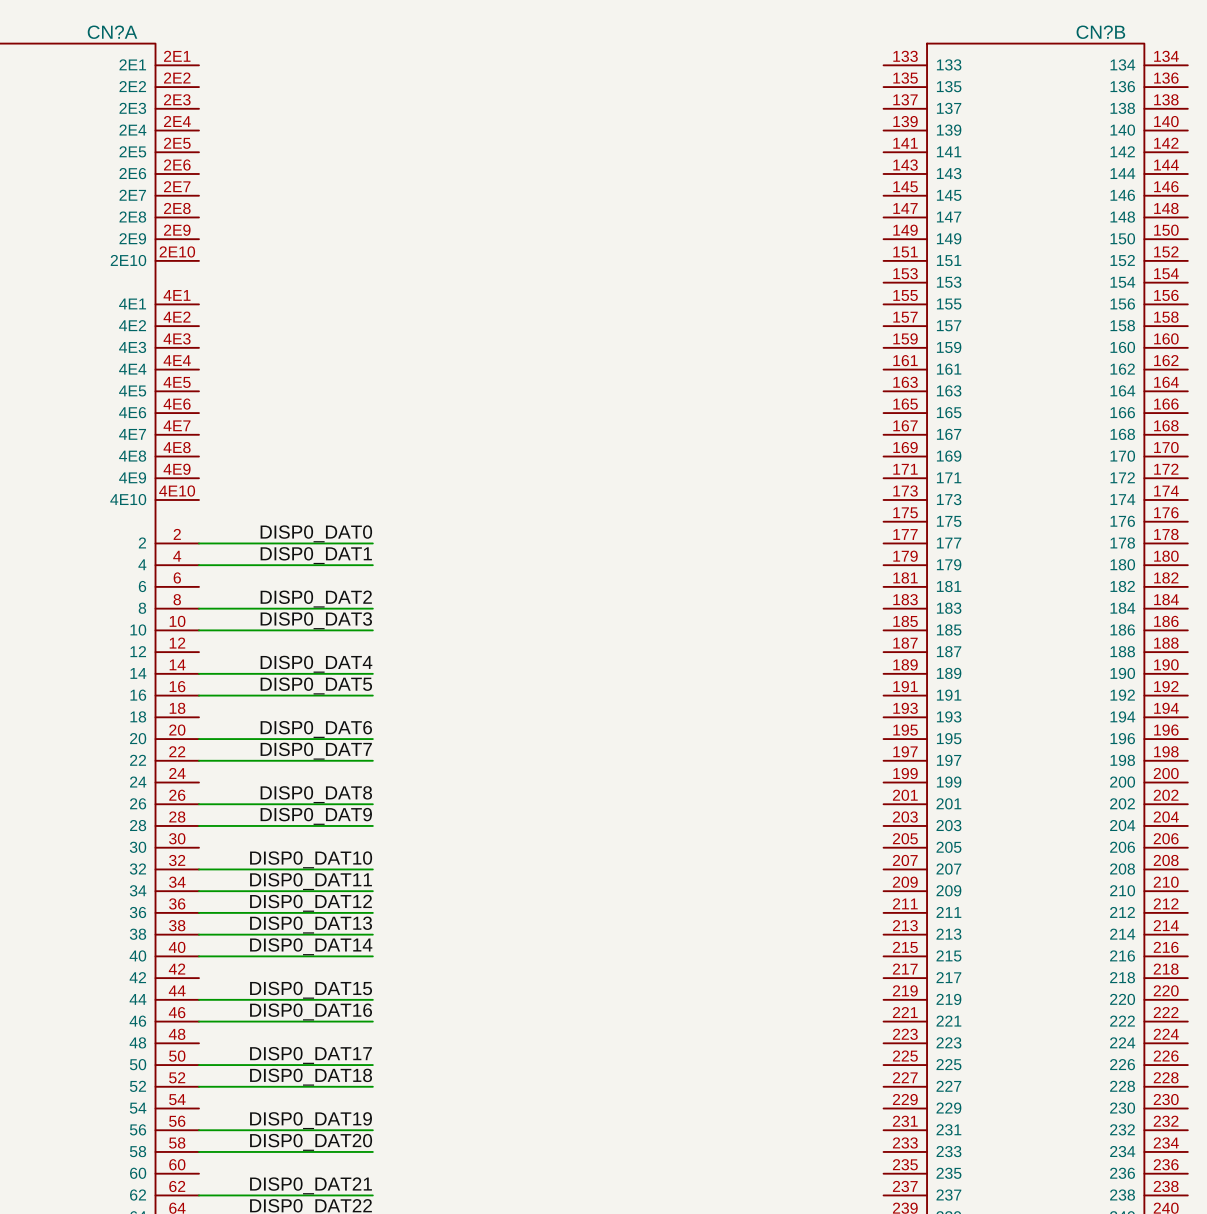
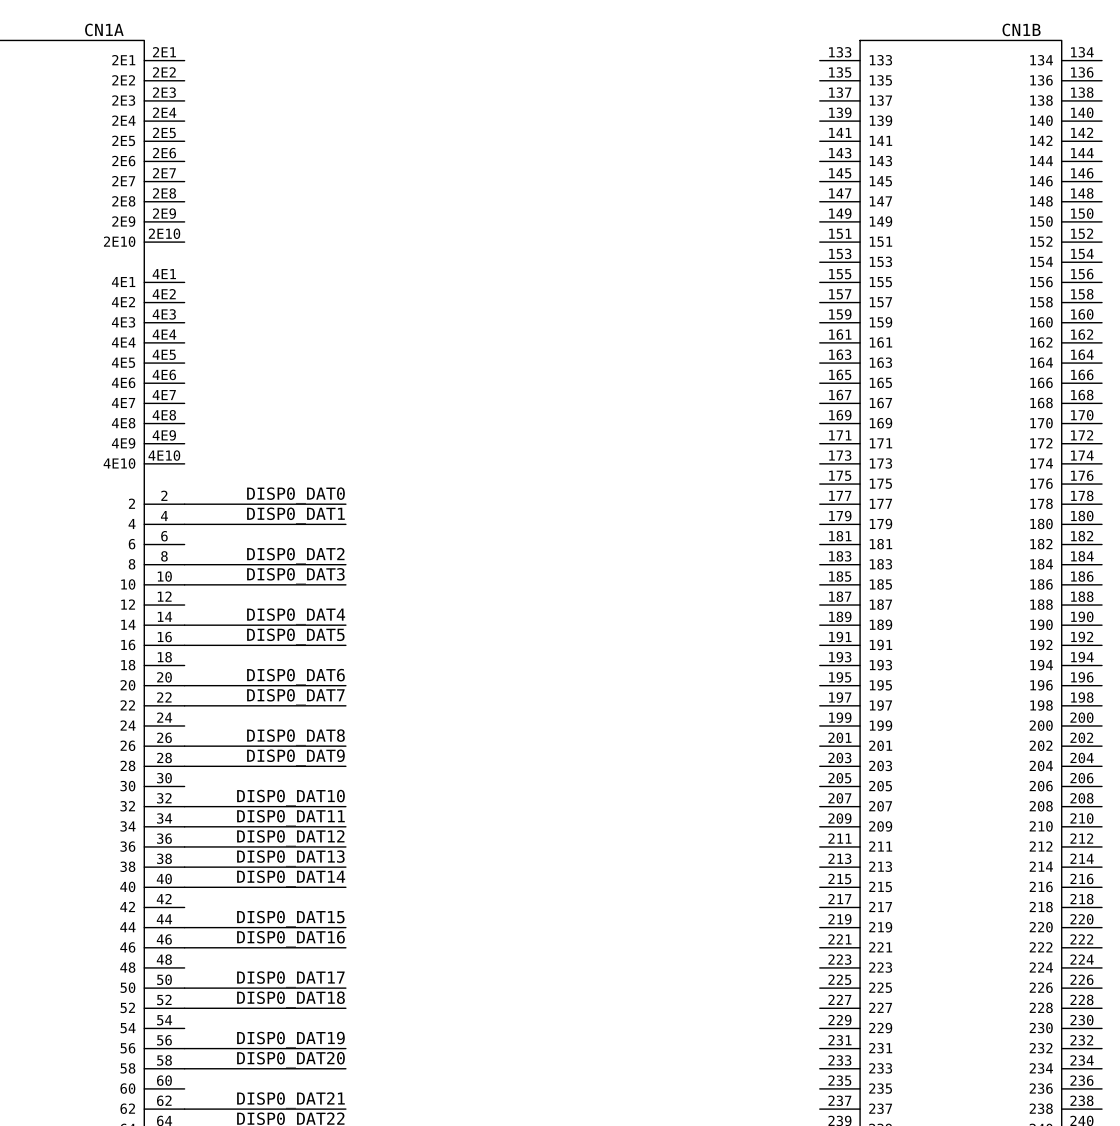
CN?A name: CN?A (112, 32) -> CN1A (104, 29)
CN?B name: CN?B (1100, 32) -> CN1B (1021, 29)

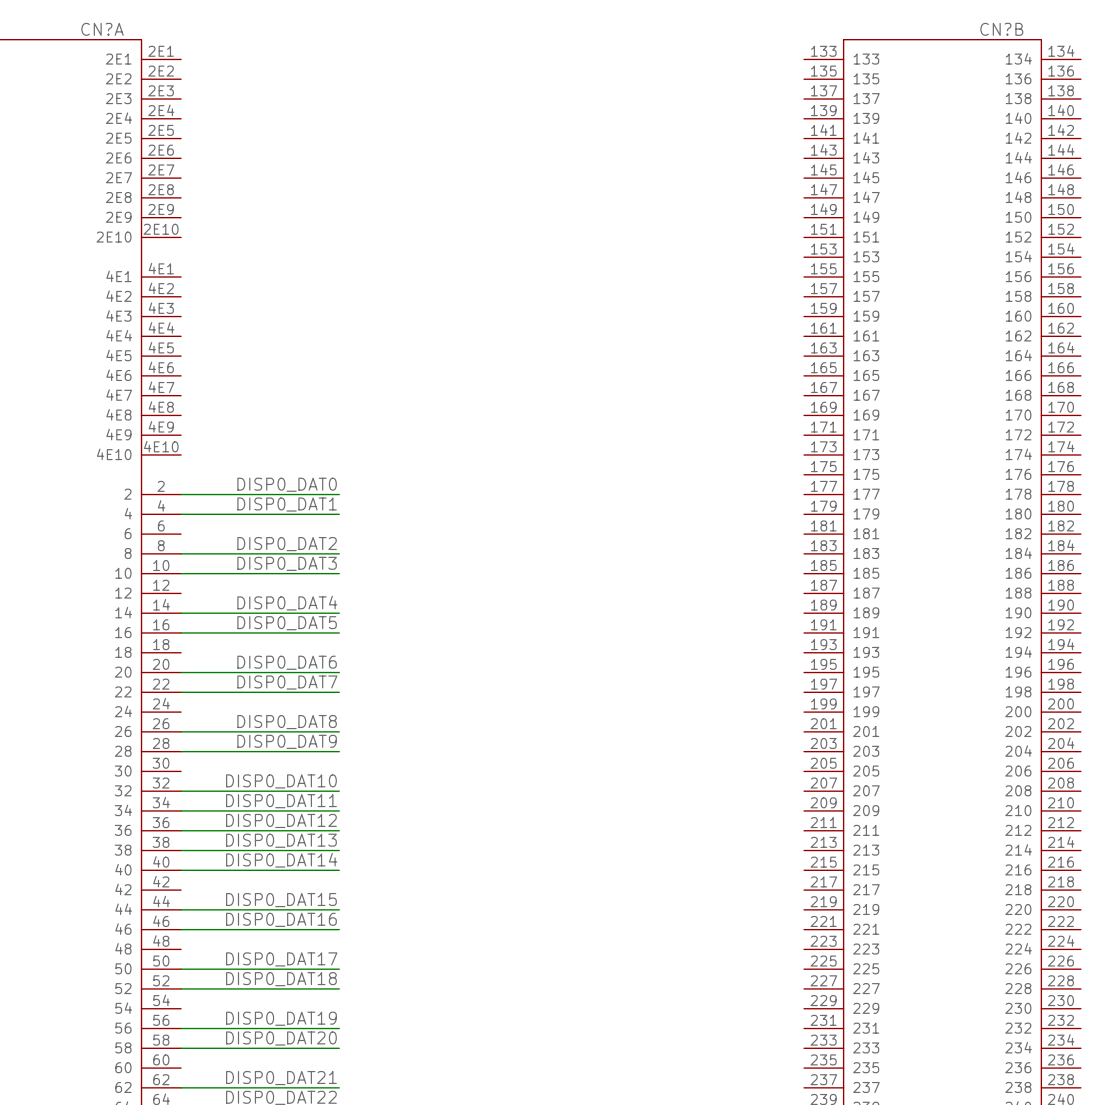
CN1A name: CN1A (104, 29) -> CN?A (102, 29)
CN1B name: CN1B (1021, 29) -> CN?B (1001, 29)

